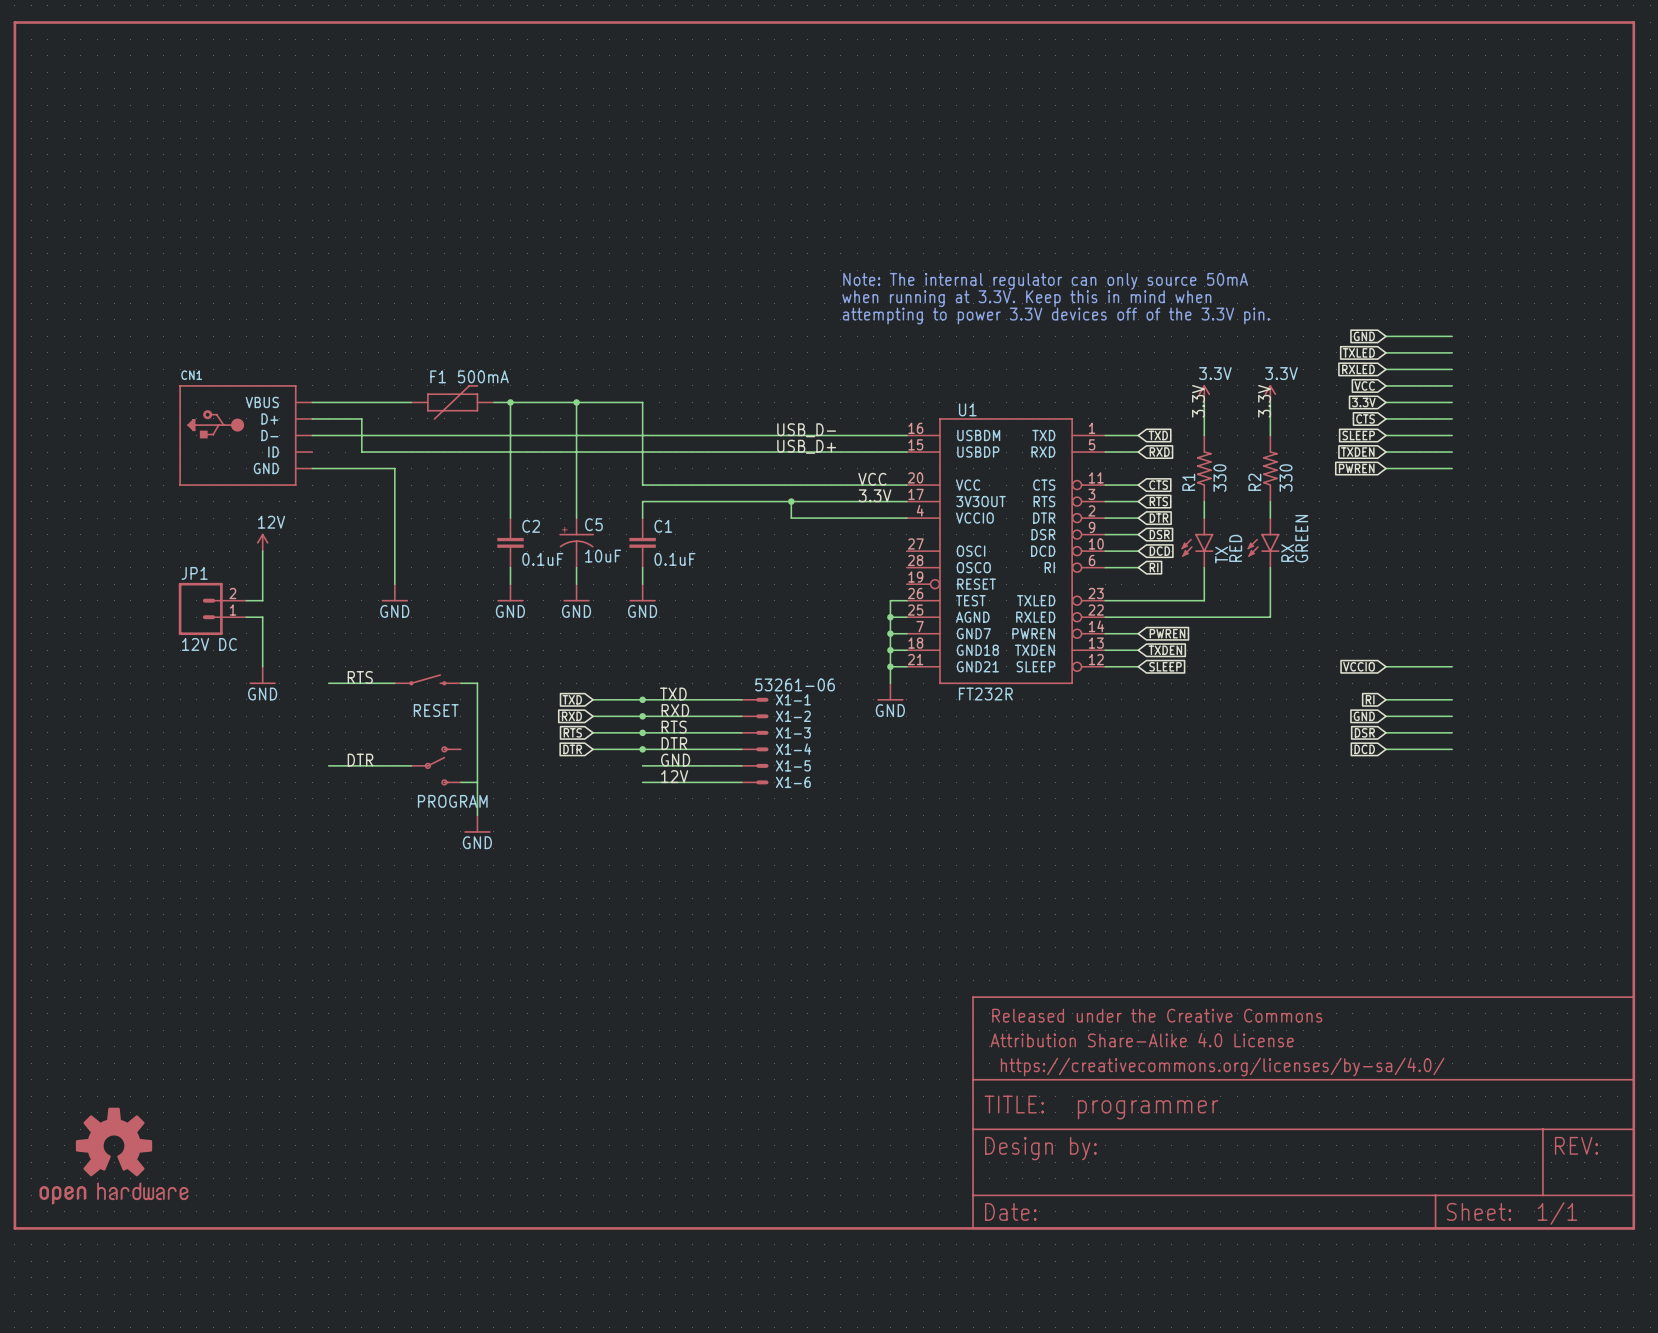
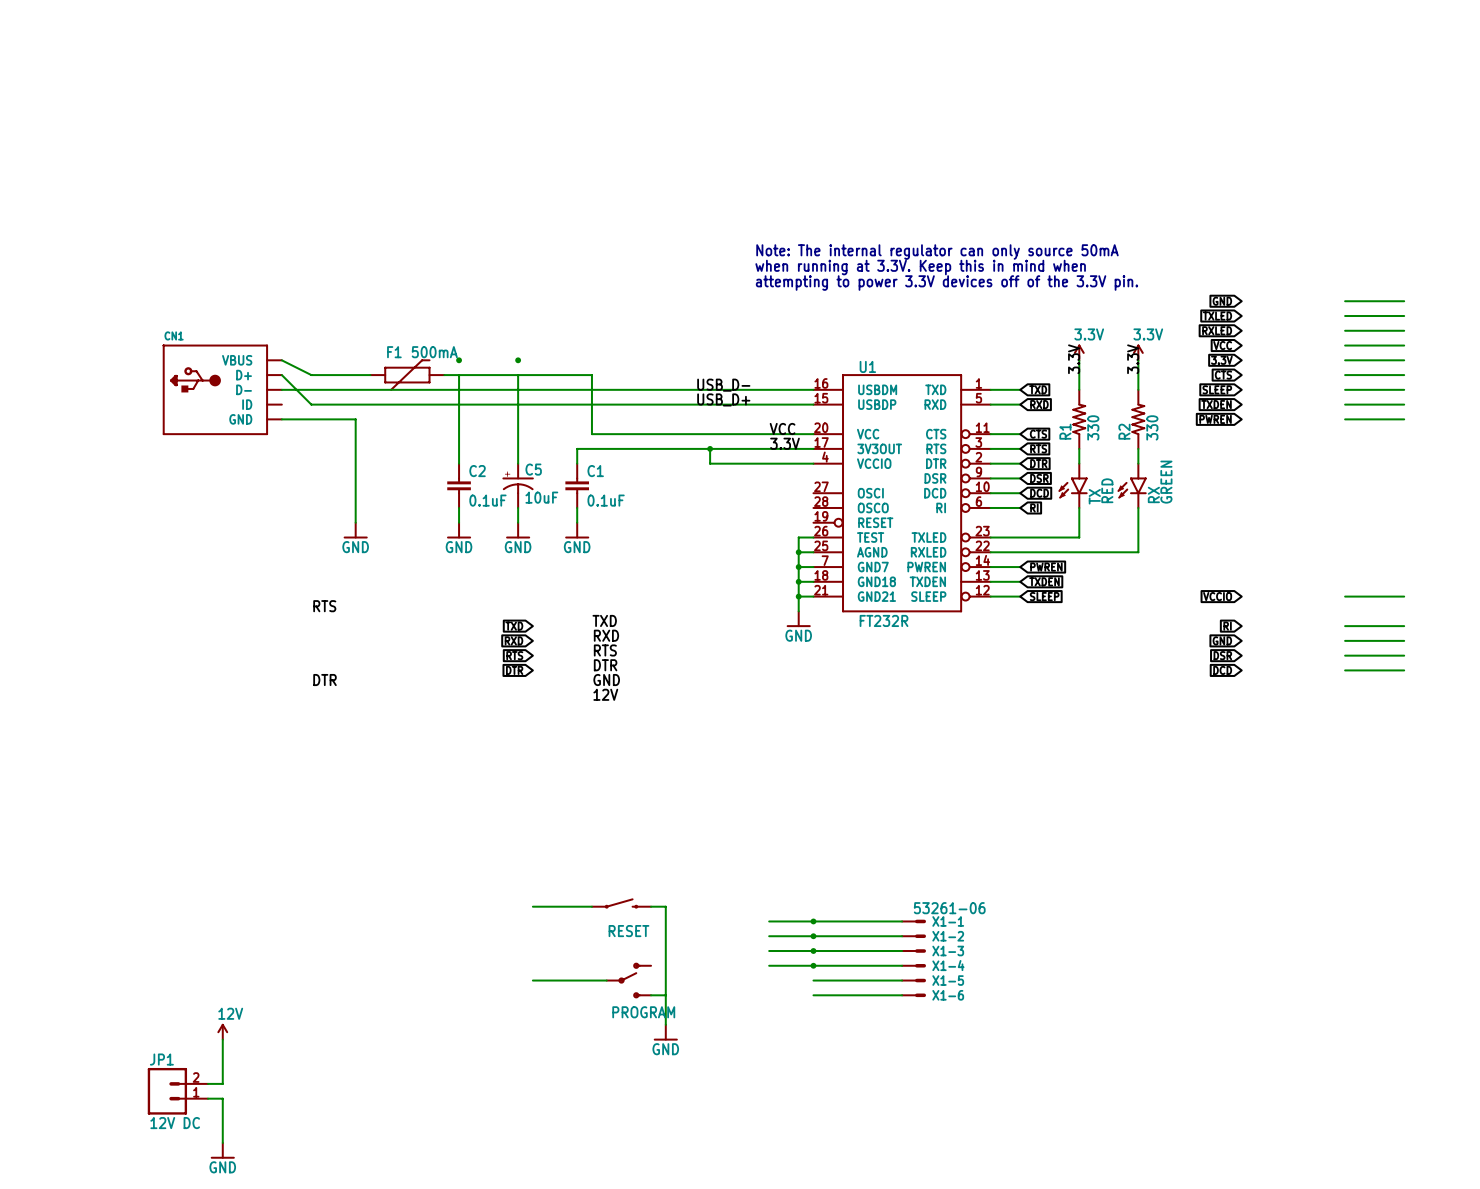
wire: (1386, 336) (1452, 336) -> (1345, 301) (1404, 301)
wire: (1386, 352) (1452, 352) -> (1345, 316) (1404, 316)
wire: (1386, 369) (1452, 369) -> (1345, 330) (1404, 330)
wire: (1386, 385) (1452, 385) -> (1345, 345) (1404, 345)
wire: (312, 402) (411, 402) -> none
F1 position: (452, 402) -> (407, 375)
wire: (493, 402) (642, 402) (642, 485) (659, 485) -> (444, 375) (591, 375) (591, 434)
wire: (510, 402) (510, 418) -> none
wire: (576, 402) (576, 418) -> none
wire: (1386, 402) (1452, 402) -> (1345, 360) (1404, 360)
wire: (312, 418) (345, 418) -> (281, 360) (311, 375)
wire: (361, 418) (361, 452) -> (281, 375) (311, 404) (326, 404)
wire: none -> (326, 375) (370, 375)
wire: (1386, 418) (1452, 418) -> (1345, 375) (1404, 375)
wire: (1386, 435) (1452, 435) -> (1345, 389) (1404, 389)
wire: (1386, 452) (1452, 452) -> (1345, 404) (1404, 404)
wire: (1386, 468) (1452, 468) -> (1345, 419) (1404, 419)
power symbol: 12V (262, 542) -> none
wire: (262, 551) (262, 600) (246, 600) -> none
JP1 position: (212, 608) -> (177, 1091)
wire: (246, 617) (262, 617) (262, 666) -> none
part: (824, 625) -> none
wire: (1386, 666) (1452, 666) -> (1345, 596) (1404, 596)
power symbol: GND (262, 675) -> none
RESET: (427, 679) -> none
wire: (328, 683) (394, 683) -> none
wire: (460, 683) (477, 683) (477, 815) -> none
wire: (593, 699) (741, 699) -> none
junction: (642, 699) -> none
X1-1 position: (755, 699) -> (914, 921)
wire: (1386, 699) (1452, 699) -> (1345, 626) (1404, 626)
wire: (593, 716) (741, 716) -> none
junction: (642, 716) -> none
X1-2 position: (755, 716) -> (914, 936)
wire: (1386, 716) (1452, 716) -> (1345, 640) (1404, 640)
wire: (593, 732) (741, 732) -> none
junction: (642, 732) -> none
X1-3 position: (755, 732) -> (914, 951)
wire: (1386, 732) (1452, 732) -> (1345, 655) (1404, 655)
wire: (593, 749) (741, 749) -> none
junction: (642, 749) -> none
X1-4 position: (755, 749) -> (914, 965)
wire: (1386, 749) (1452, 749) -> (1345, 670) (1404, 670)
wire: (328, 765) (411, 765) -> none
PROGRAM: (436, 765) -> none
wire: (642, 765) (741, 765) -> none
X1-5 position: (755, 765) -> (914, 980)
wire: (460, 782) (477, 782) -> none
wire: (642, 782) (741, 782) -> none
X1-6 position: (755, 782) -> (914, 995)
power symbol: GND (477, 824) -> none
RESET: none -> (621, 903)
wire: none -> (532, 906) (591, 906)
wire: none -> (651, 906) (665, 906) (665, 1024)
wire: none -> (769, 921) (902, 921)
junction: none -> (813, 921)
wire: none -> (769, 936) (902, 936)
junction: none -> (813, 936)
wire: none -> (769, 951) (902, 951)
junction: none -> (813, 951)
wire: none -> (769, 965) (902, 965)
junction: none -> (813, 965)
wire: none -> (532, 980) (606, 980)
PROGRAM: none -> (628, 980)
wire: none -> (813, 980) (902, 980)
wire: none -> (651, 995) (665, 995)
wire: none -> (813, 995) (902, 995)
part: (1303, 1112) -> none
power symbol: none -> 12V (222, 1031)
power symbol: none -> GND (665, 1032)
part: (113, 1156) -> none
wire: none -> (222, 1039) (222, 1083) (208, 1083)
wire: none -> (208, 1098) (222, 1098) (222, 1142)
power symbol: none -> GND (222, 1150)

